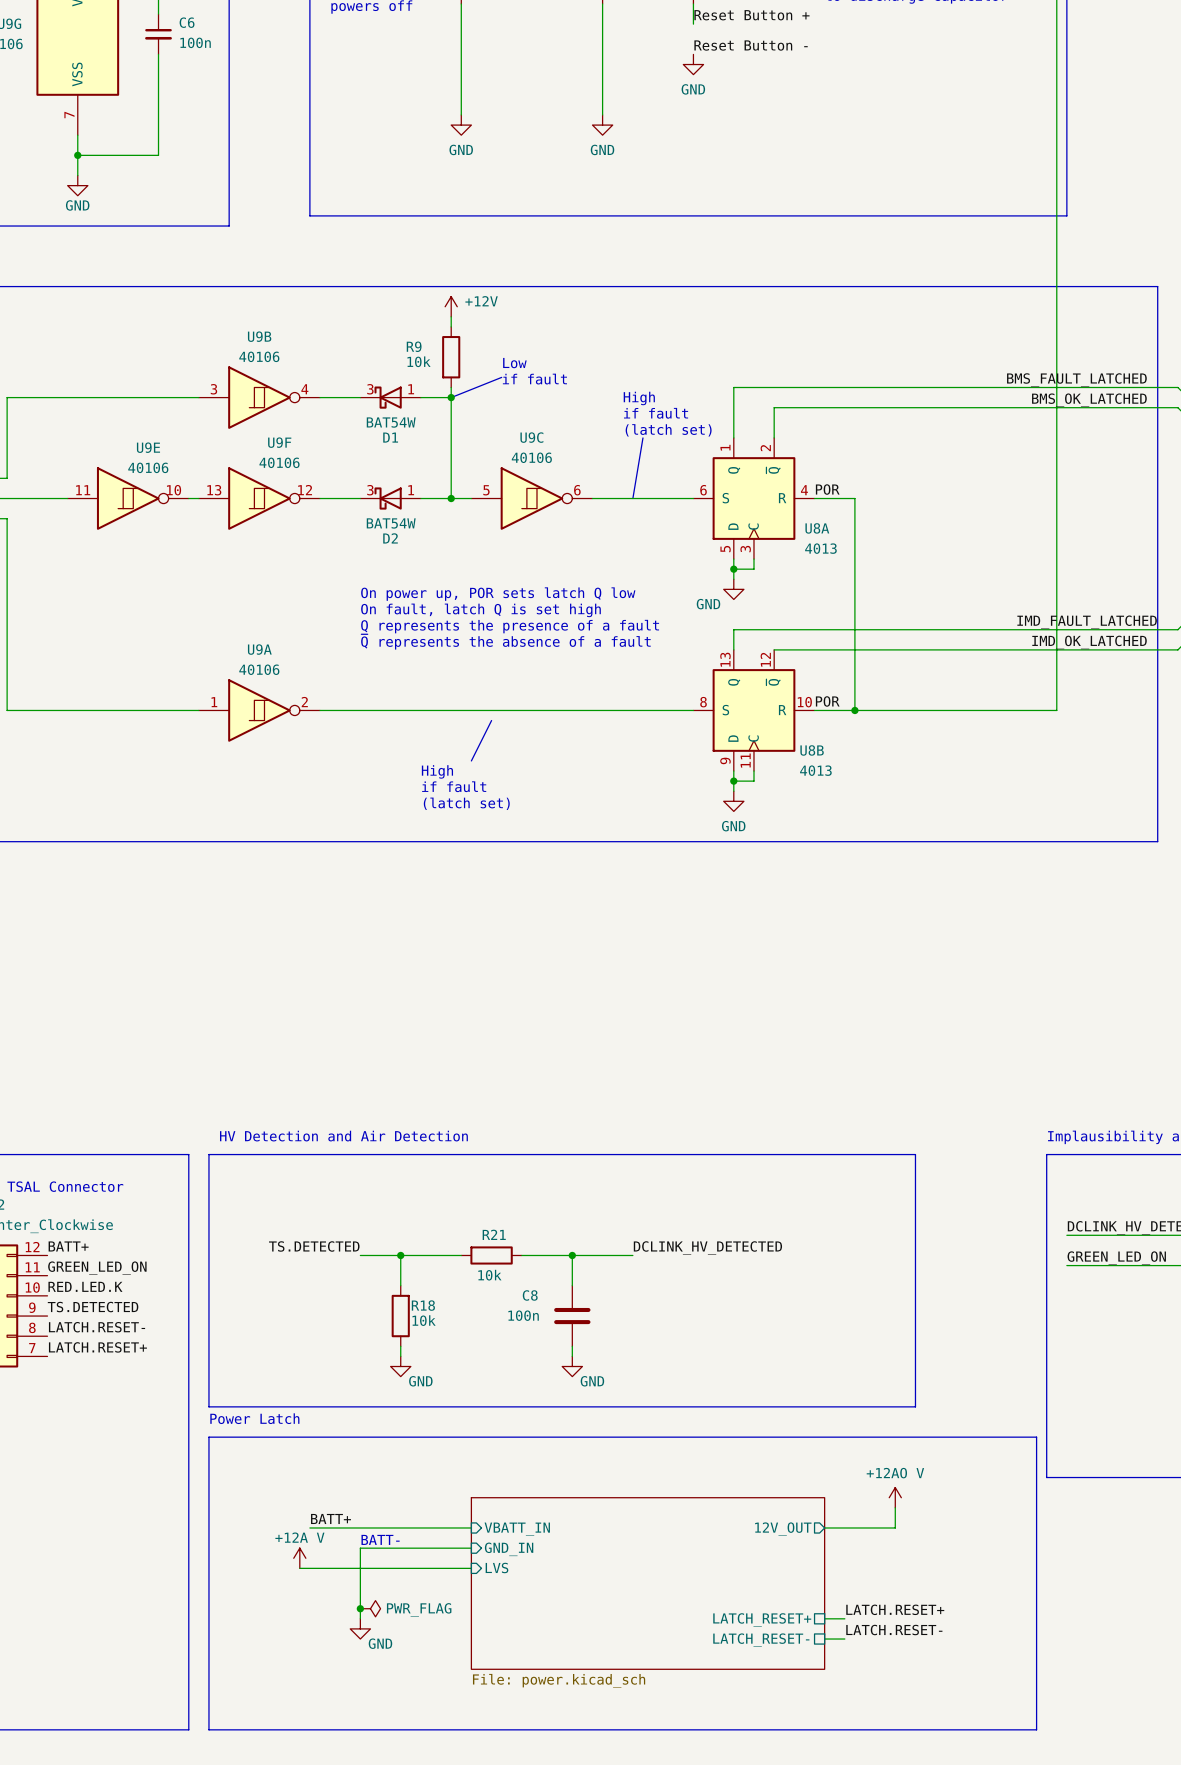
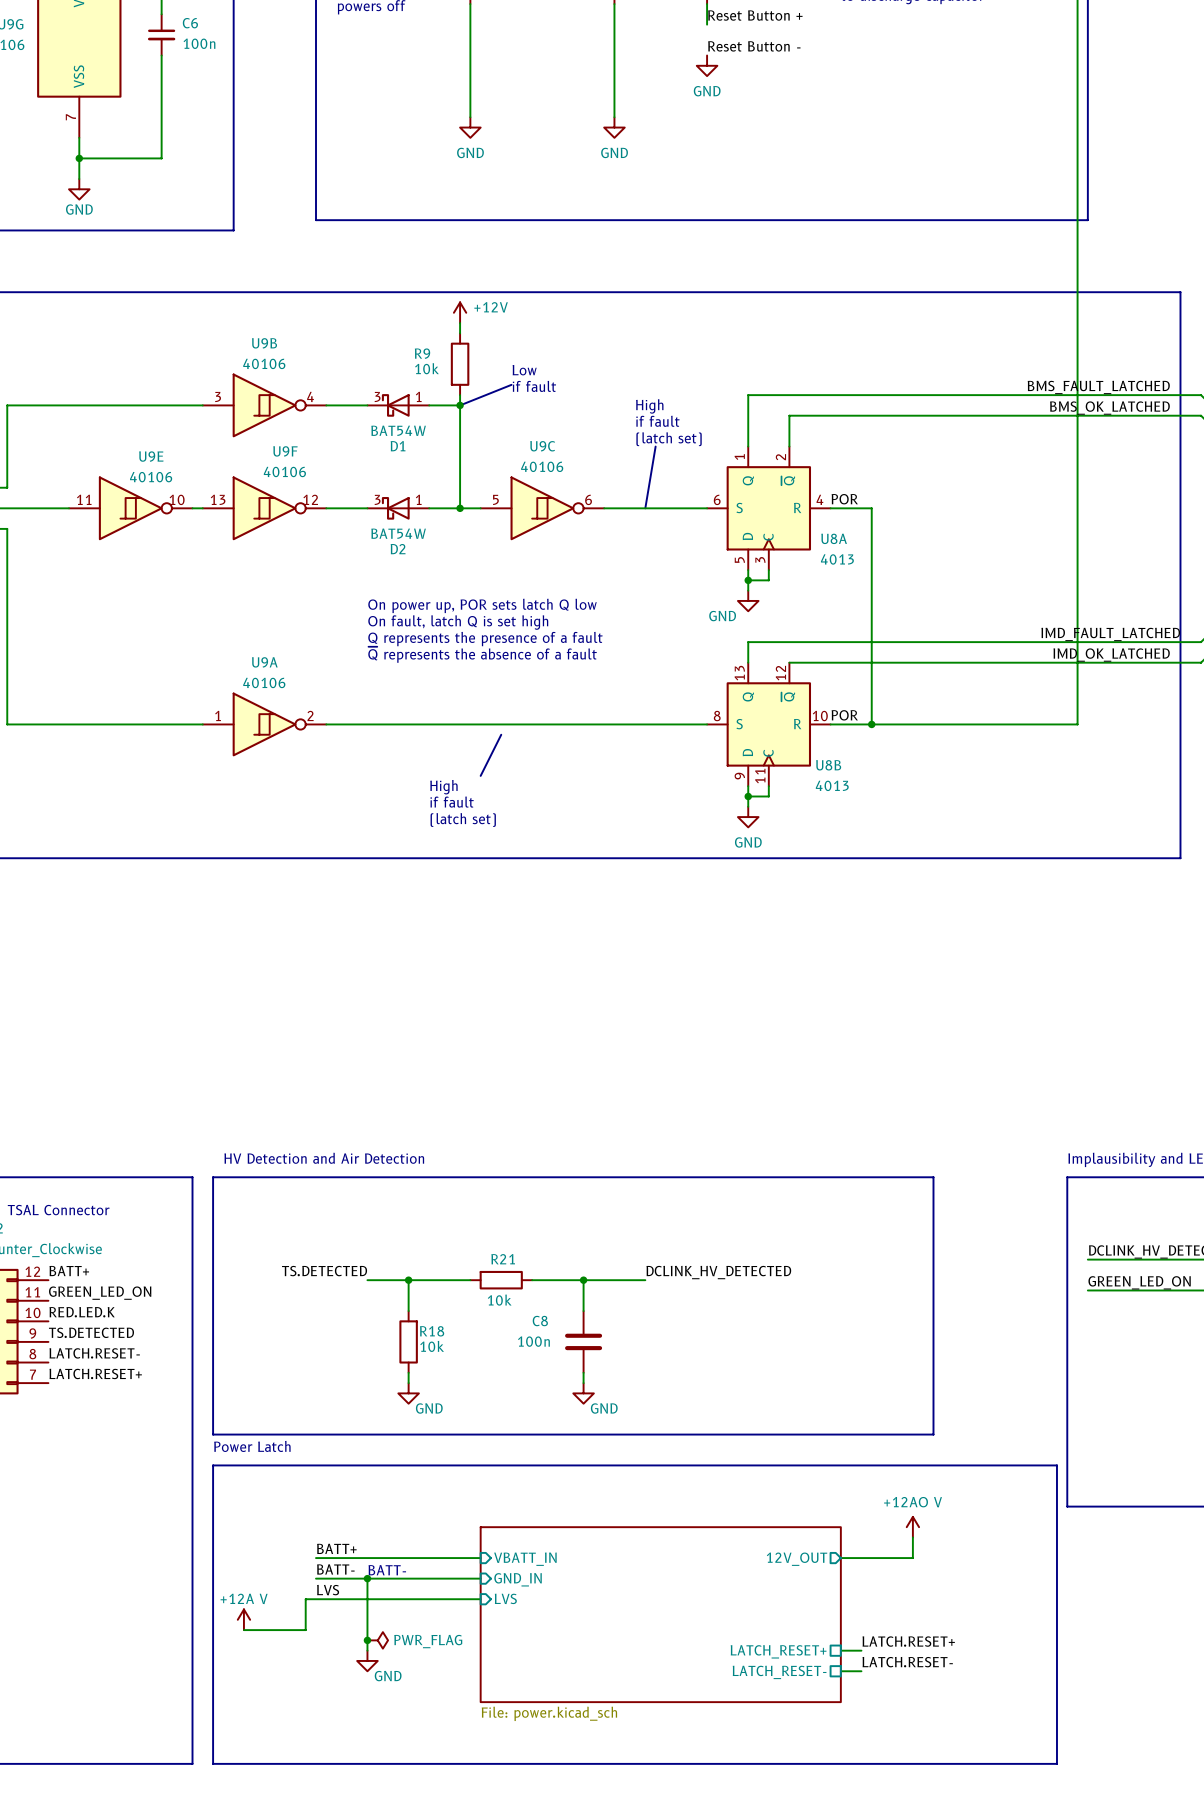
label: none -> BATT- (335, 1569)
wire: none -> (316, 1578) (367, 1578)
junction: none -> (367, 1578)
power symbol position: +12A V (299, 1558) -> +12A V (243, 1619)
label: none -> LVS (328, 1590)
wire: none -> (305, 1599) (305, 1630) (243, 1630)

